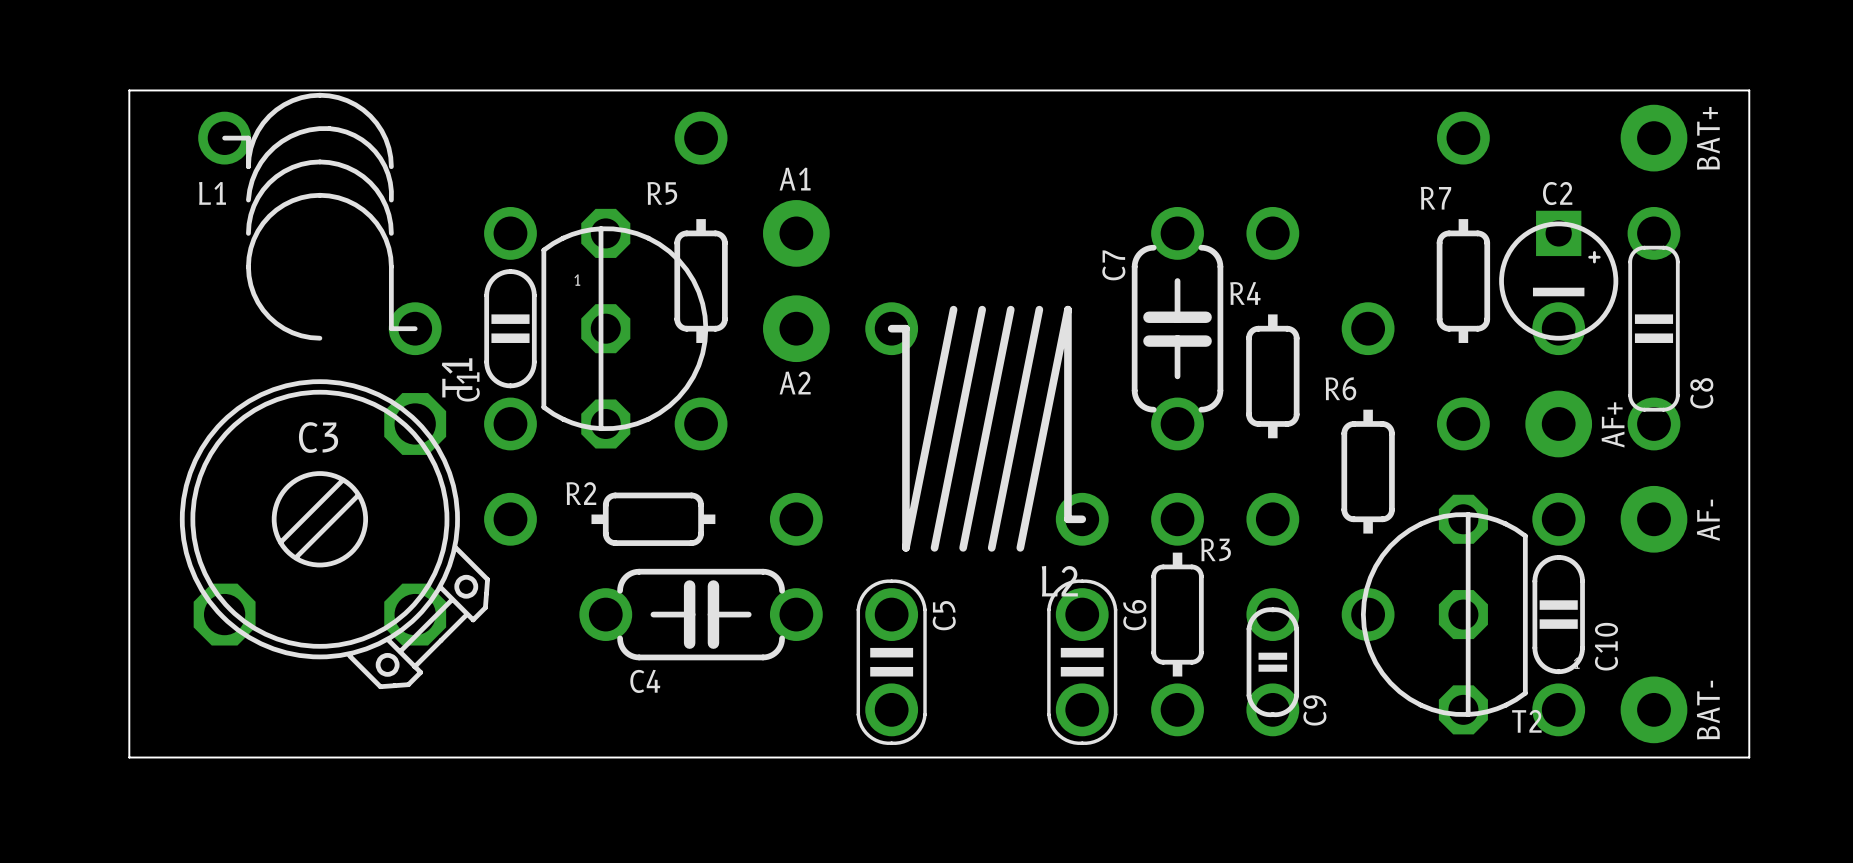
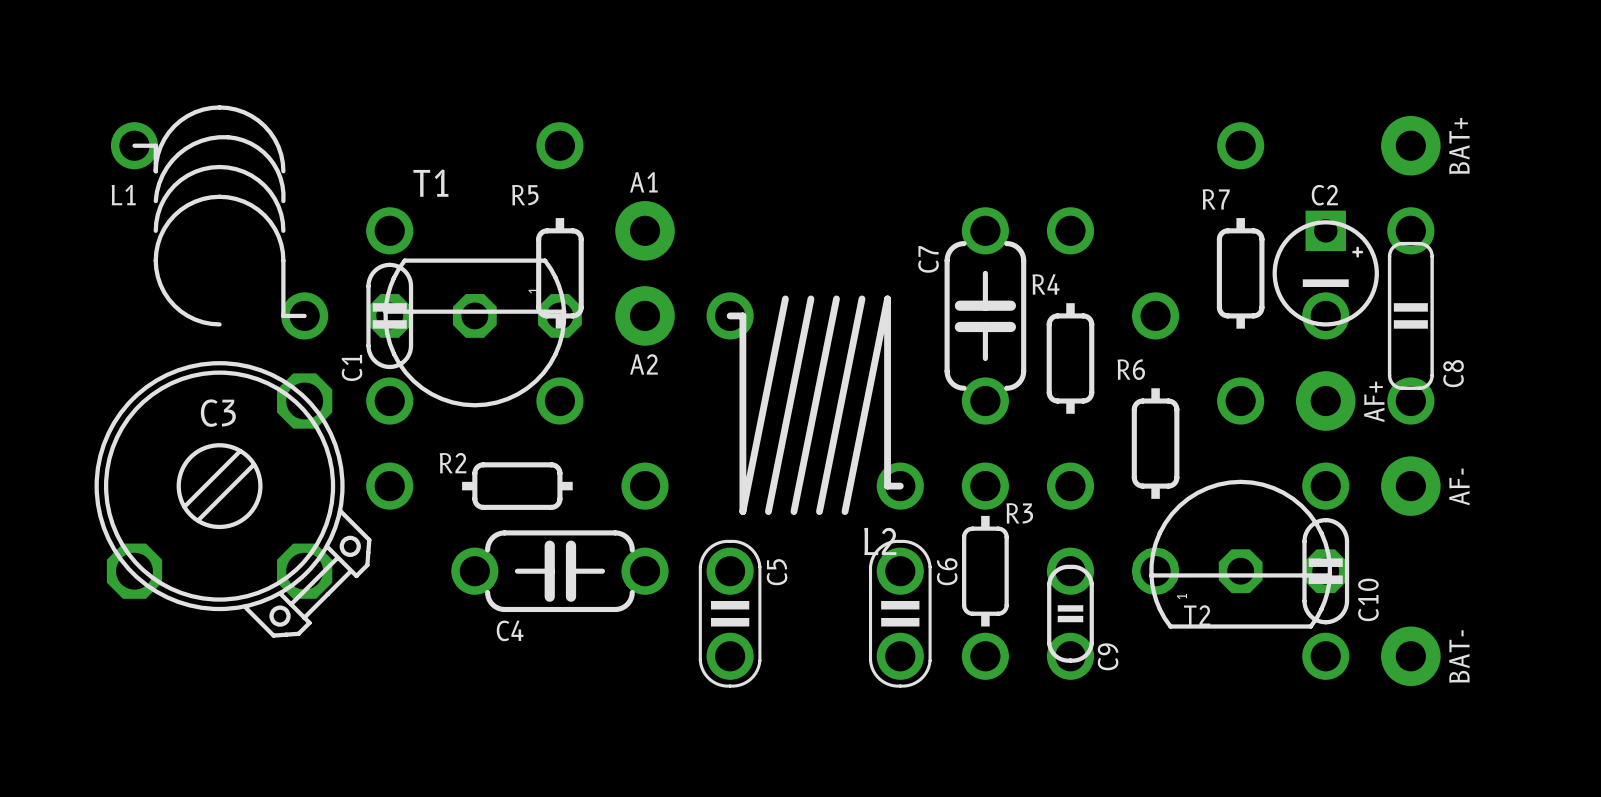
board edge: (129, 90) (1749, 90) (1749, 757) (129, 757) (129, 90) -> none
T1 footprint: [541, 208, 709, 449] -> [367, 258, 582, 408]
T1 name position: T1 (457, 377) -> T1 (430, 183)
T2 footprint: [1360, 494, 1528, 735] -> [1133, 479, 1348, 629]
T2 name position: T2 (1526, 721) -> T2 (1197, 615)

